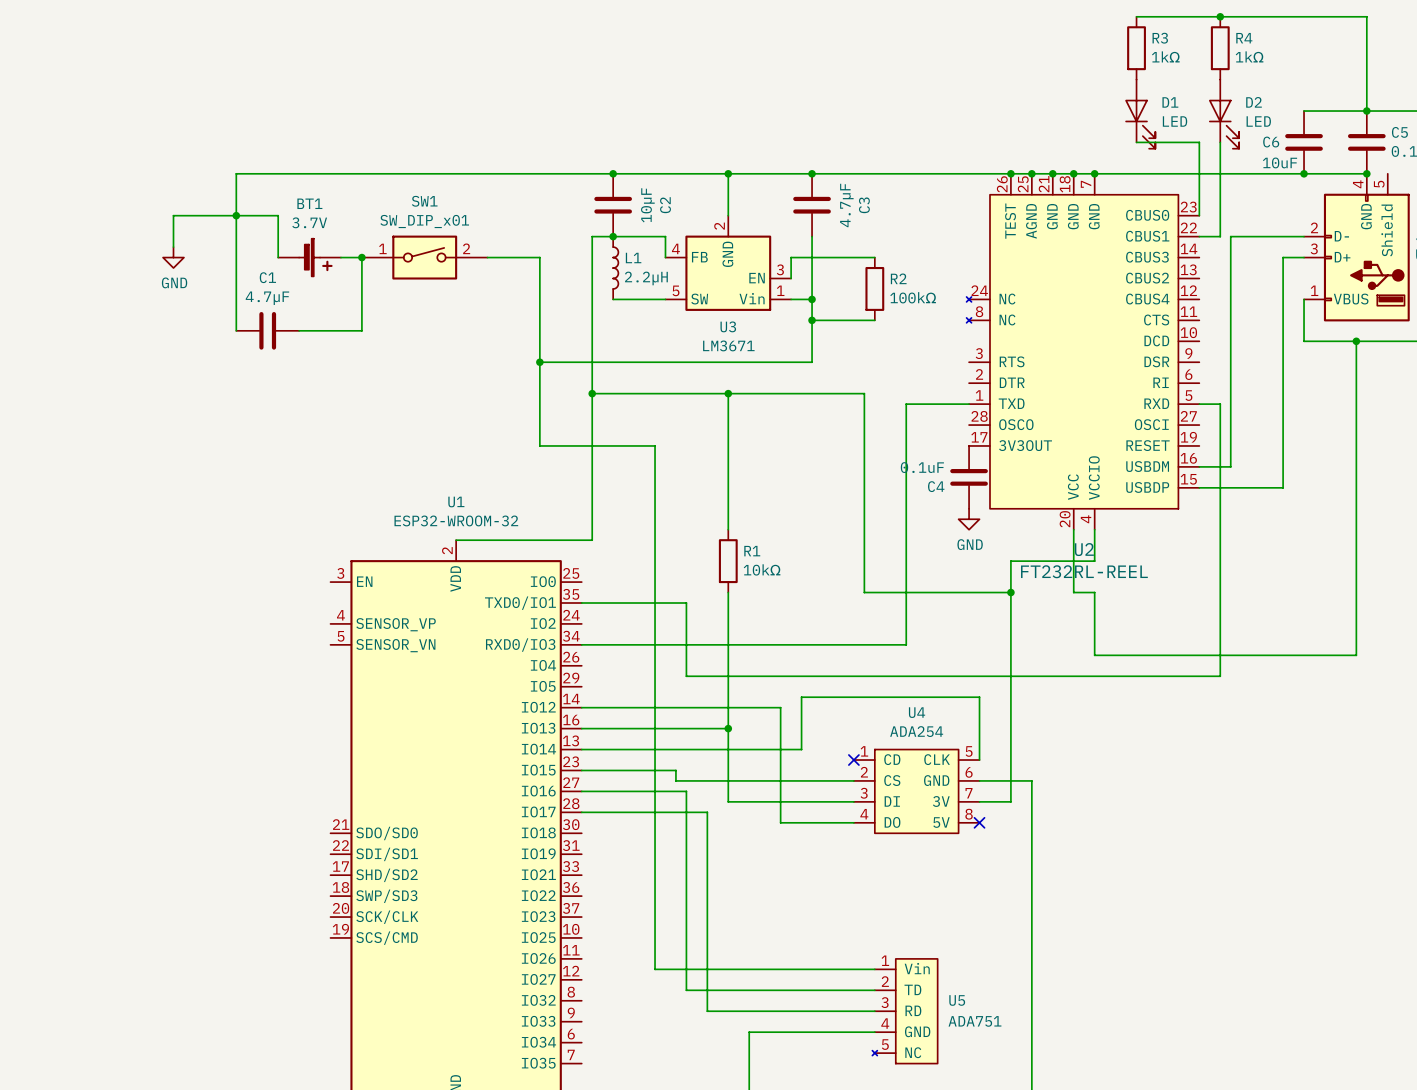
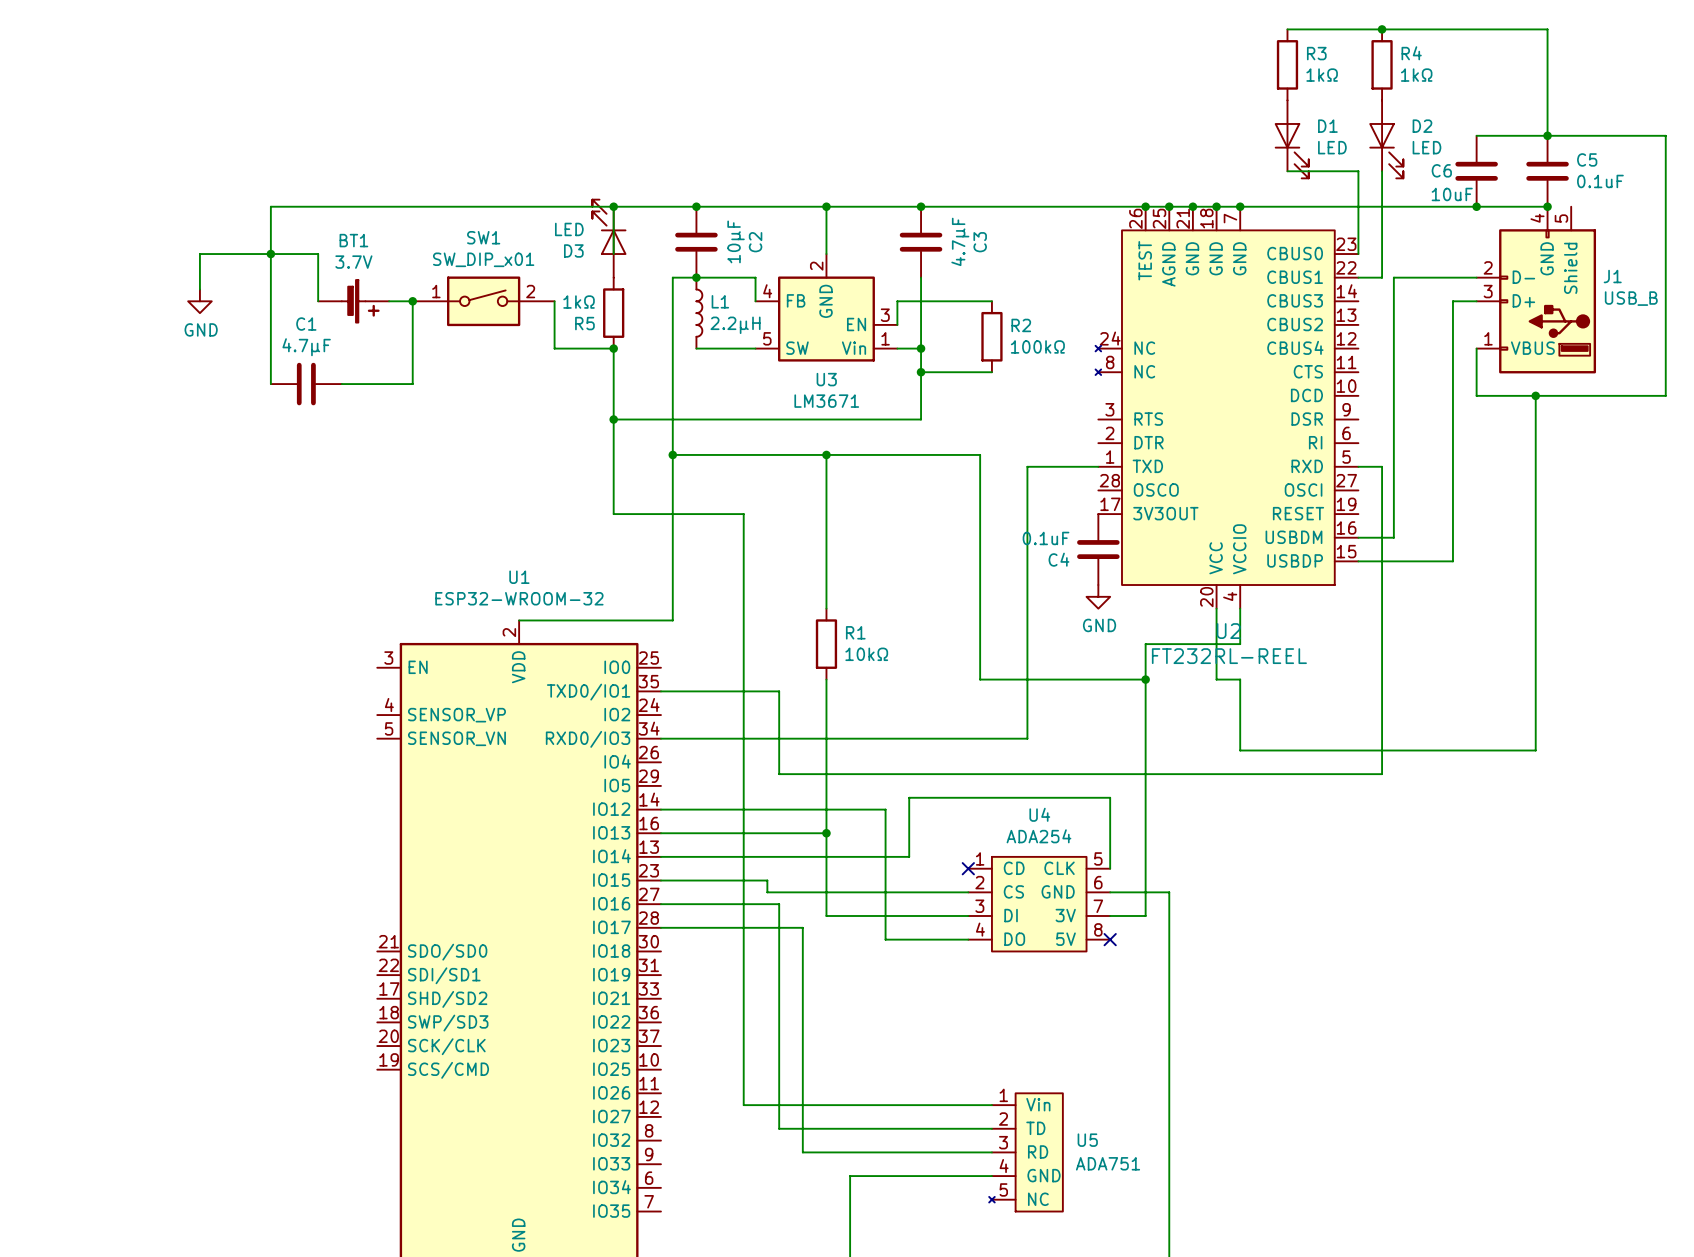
wire: none -> (613, 206) (613, 254)
junction: none -> (613, 206)
D3: none -> LED (609, 238)
wire: (487, 257) (539, 257) (539, 299) -> (554, 301) (554, 348) (613, 348)
R5: none -> 1kΩ (613, 313)
junction: none -> (613, 348)

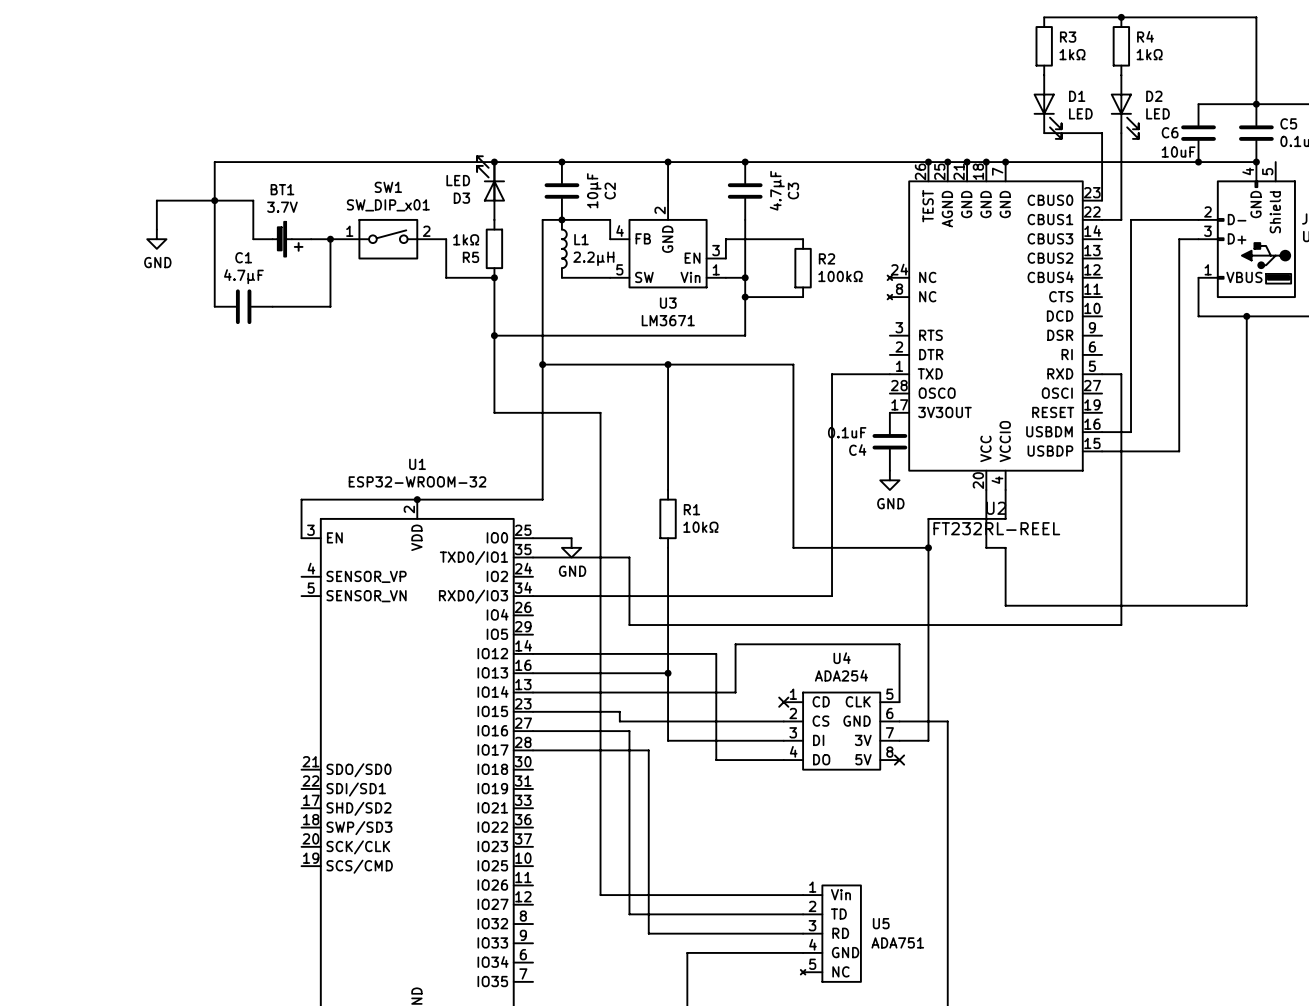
wire: none -> (417, 499) (301, 499) (301, 538)
junction: none -> (417, 499)
wire: none -> (533, 538) (571, 538)
power symbol: none -> GND (571, 547)

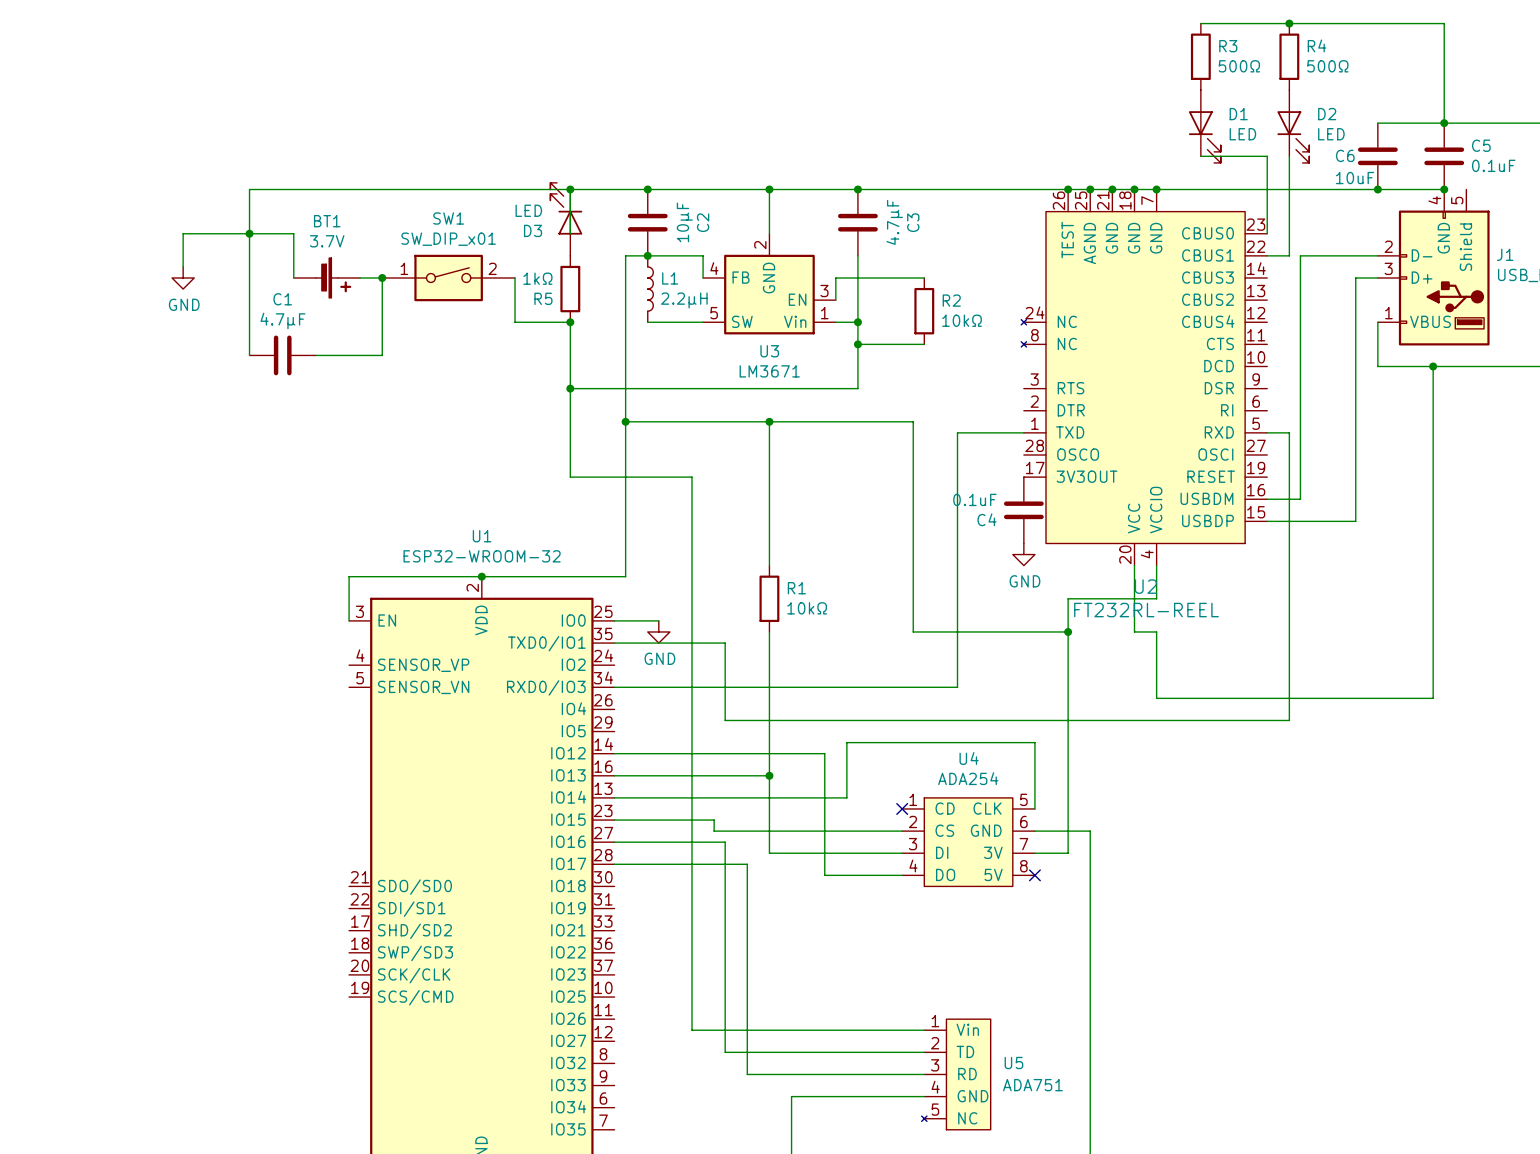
R3 value: 1kΩ (1072, 54) -> 500Ω (1239, 66)
R4 value: 1kΩ (1149, 54) -> 500Ω (1327, 66)
R2 value: 100kΩ (840, 276) -> 10kΩ (962, 320)

